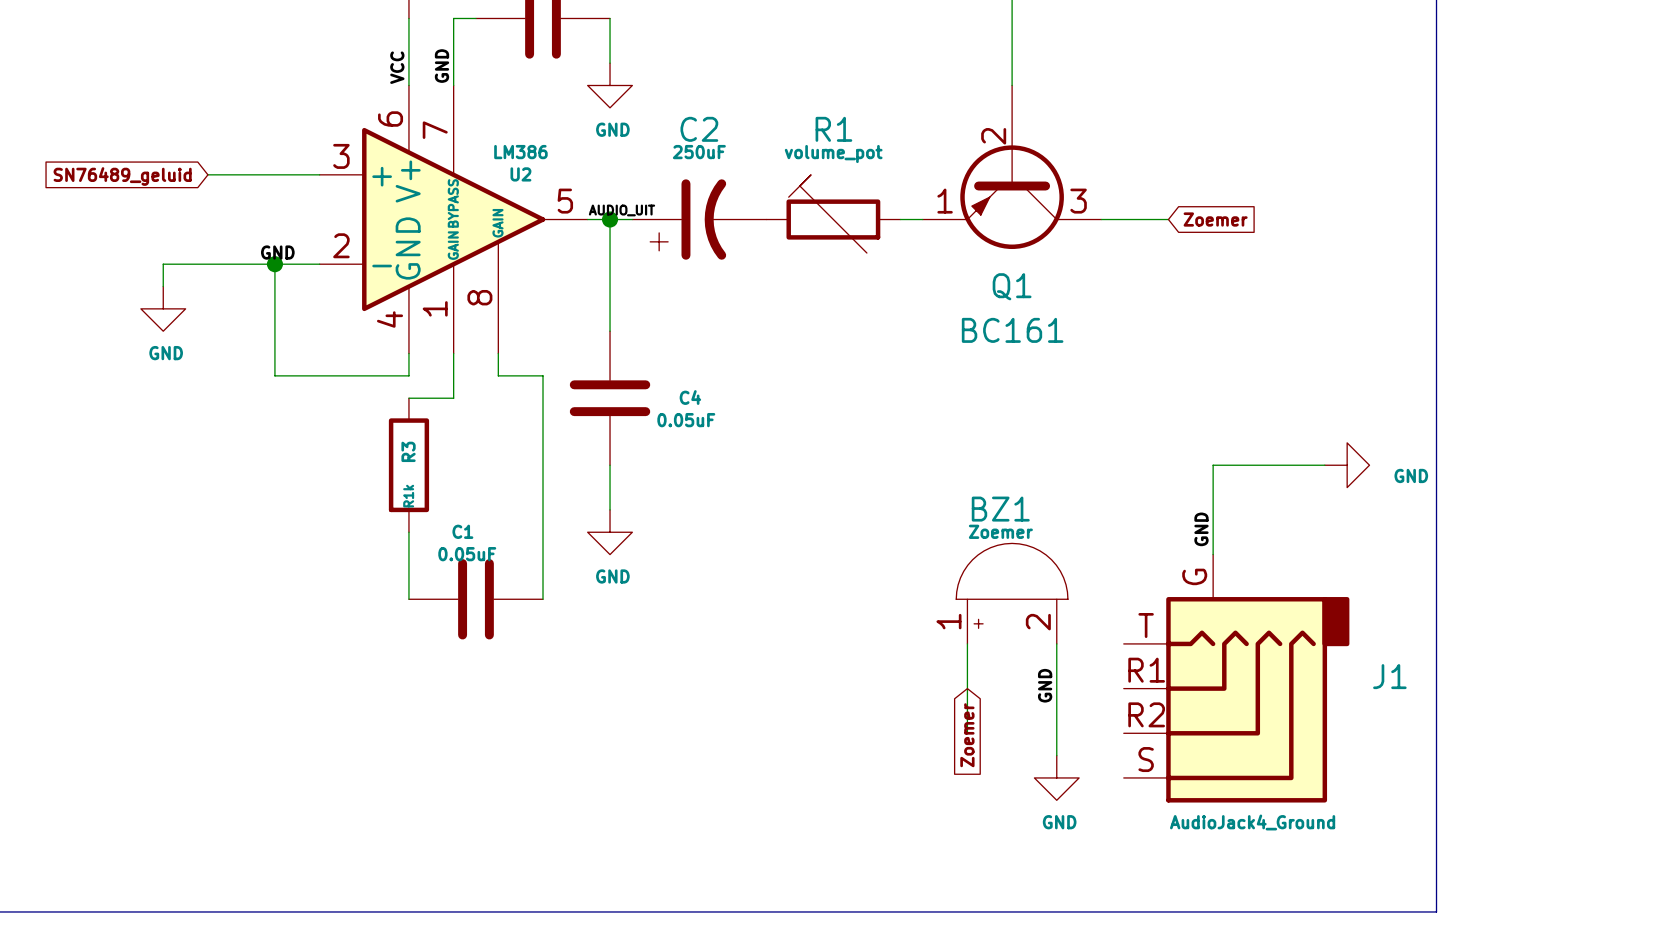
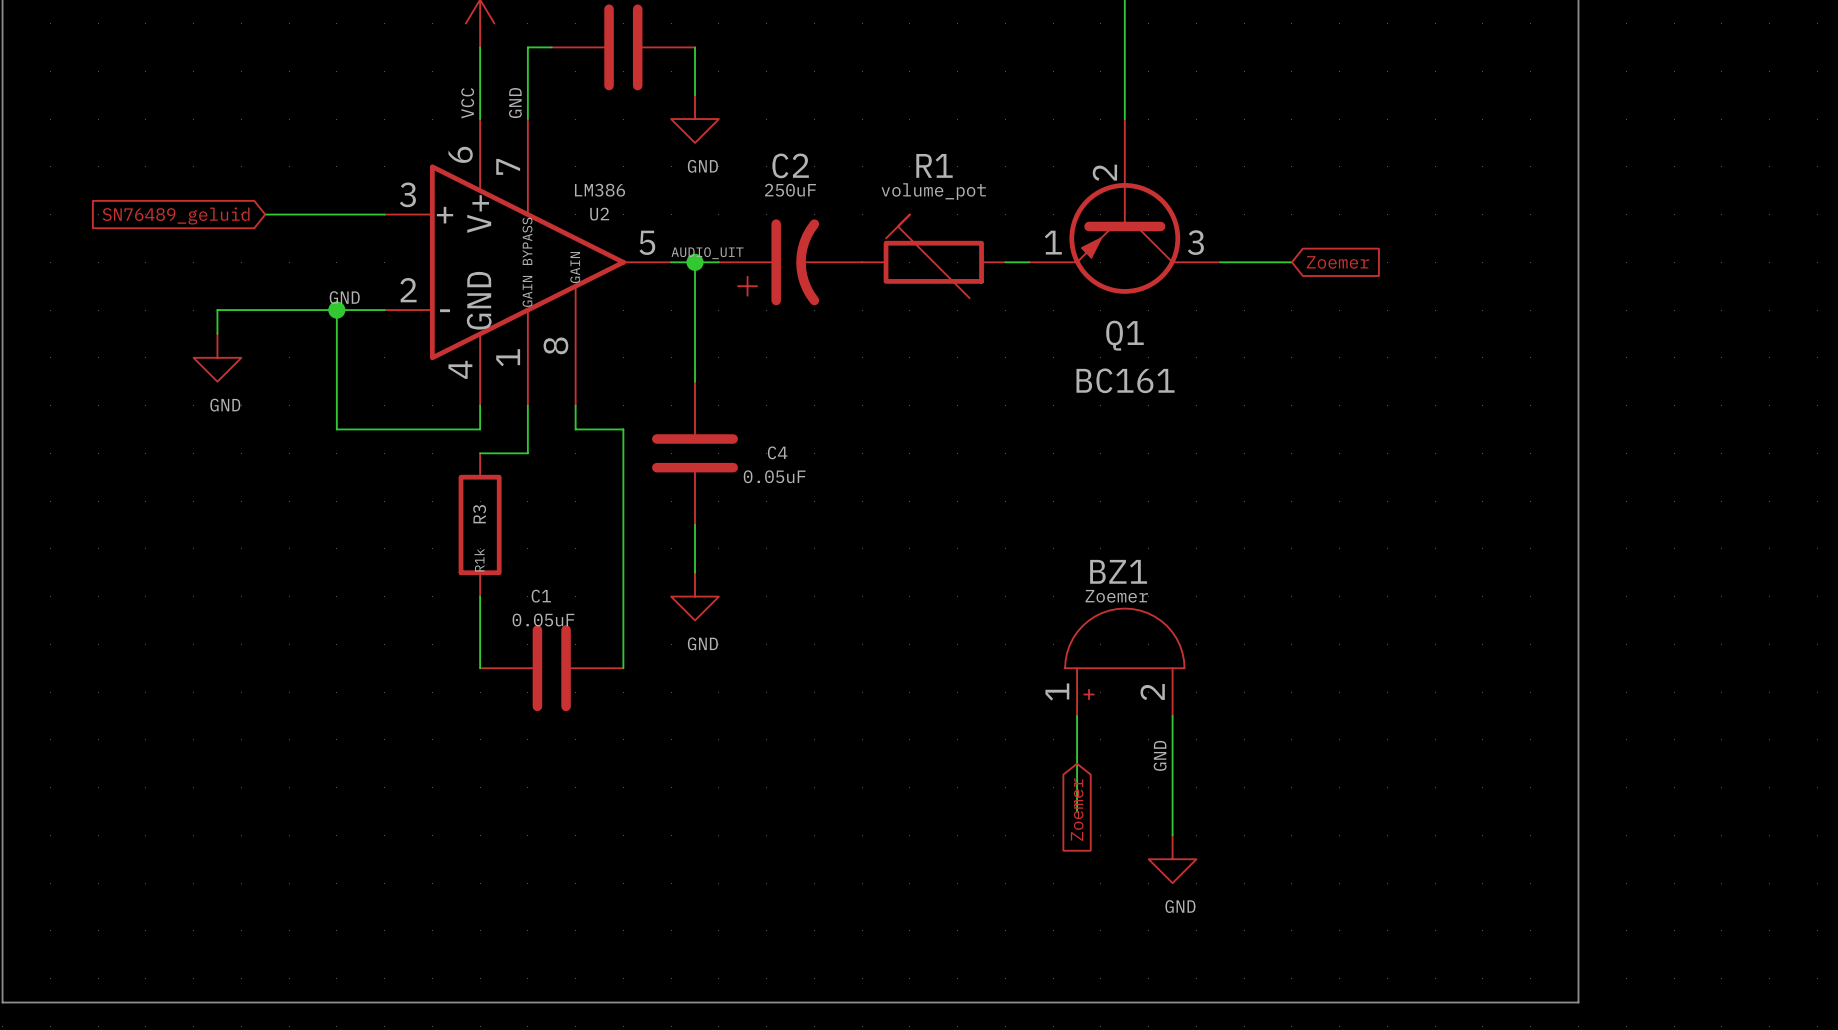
wire: (1324, 465) (1213, 465) (1213, 554) -> none
power symbol: GND (1347, 465) -> none
label: GND (1201, 529) -> none
J1: AudioJack4_Ground (1236, 678) -> none

